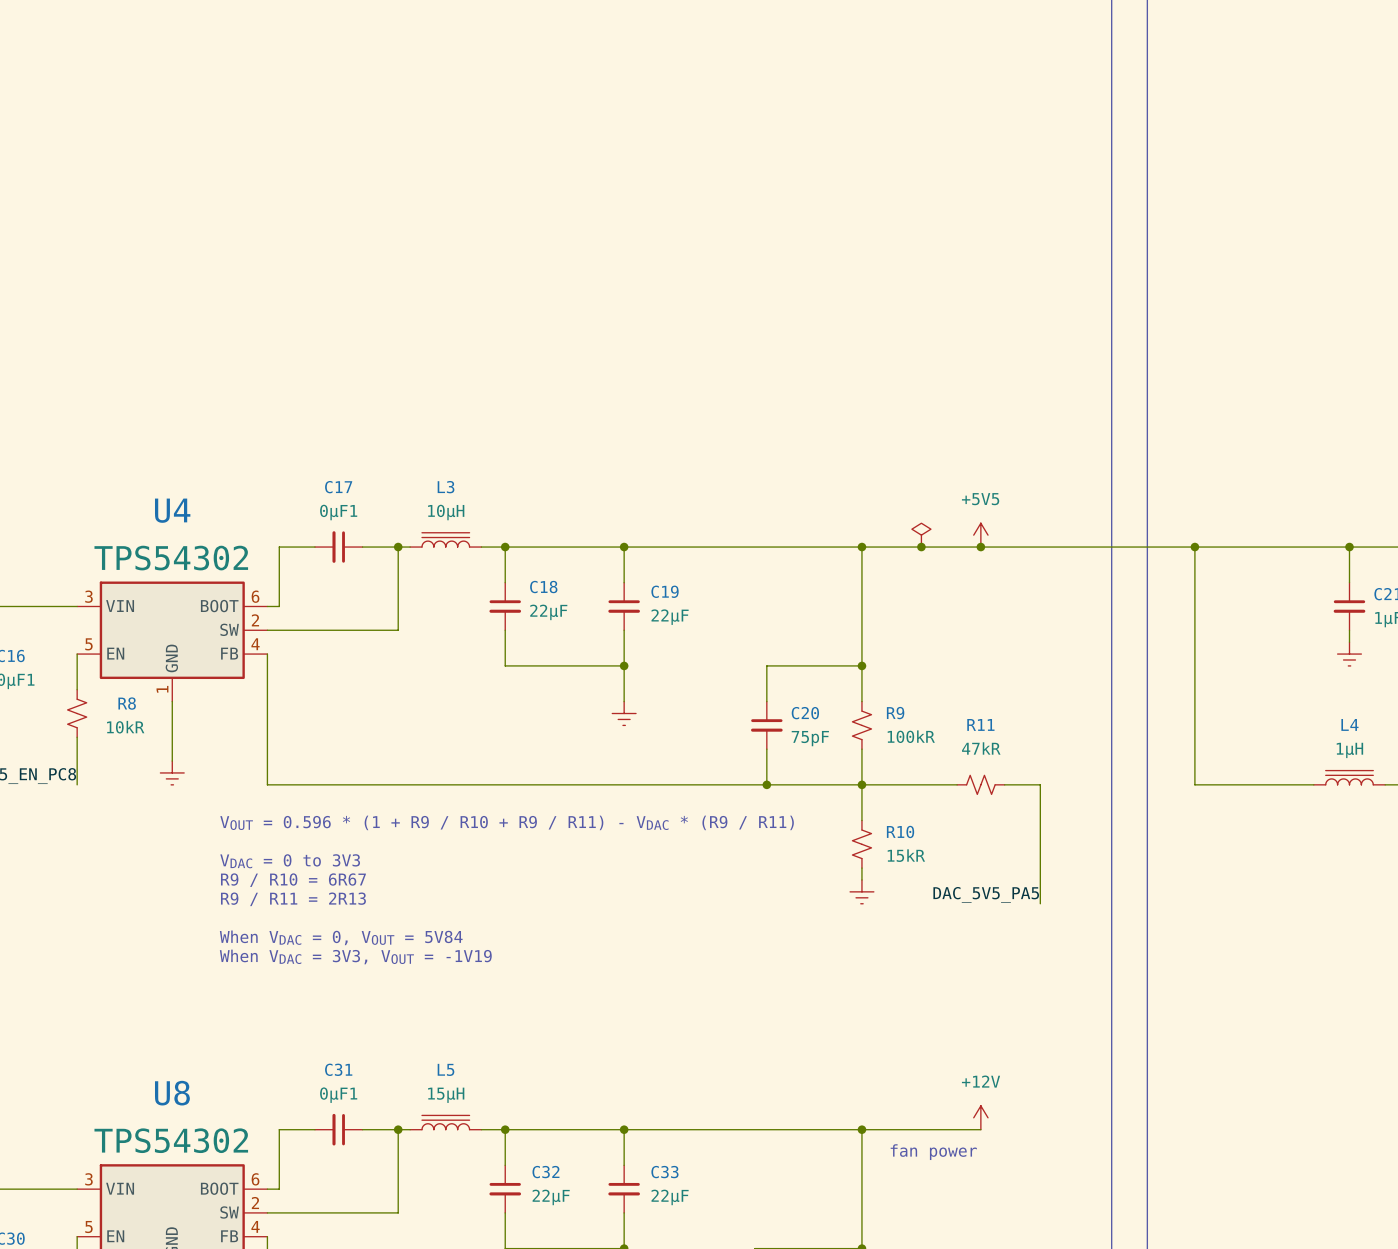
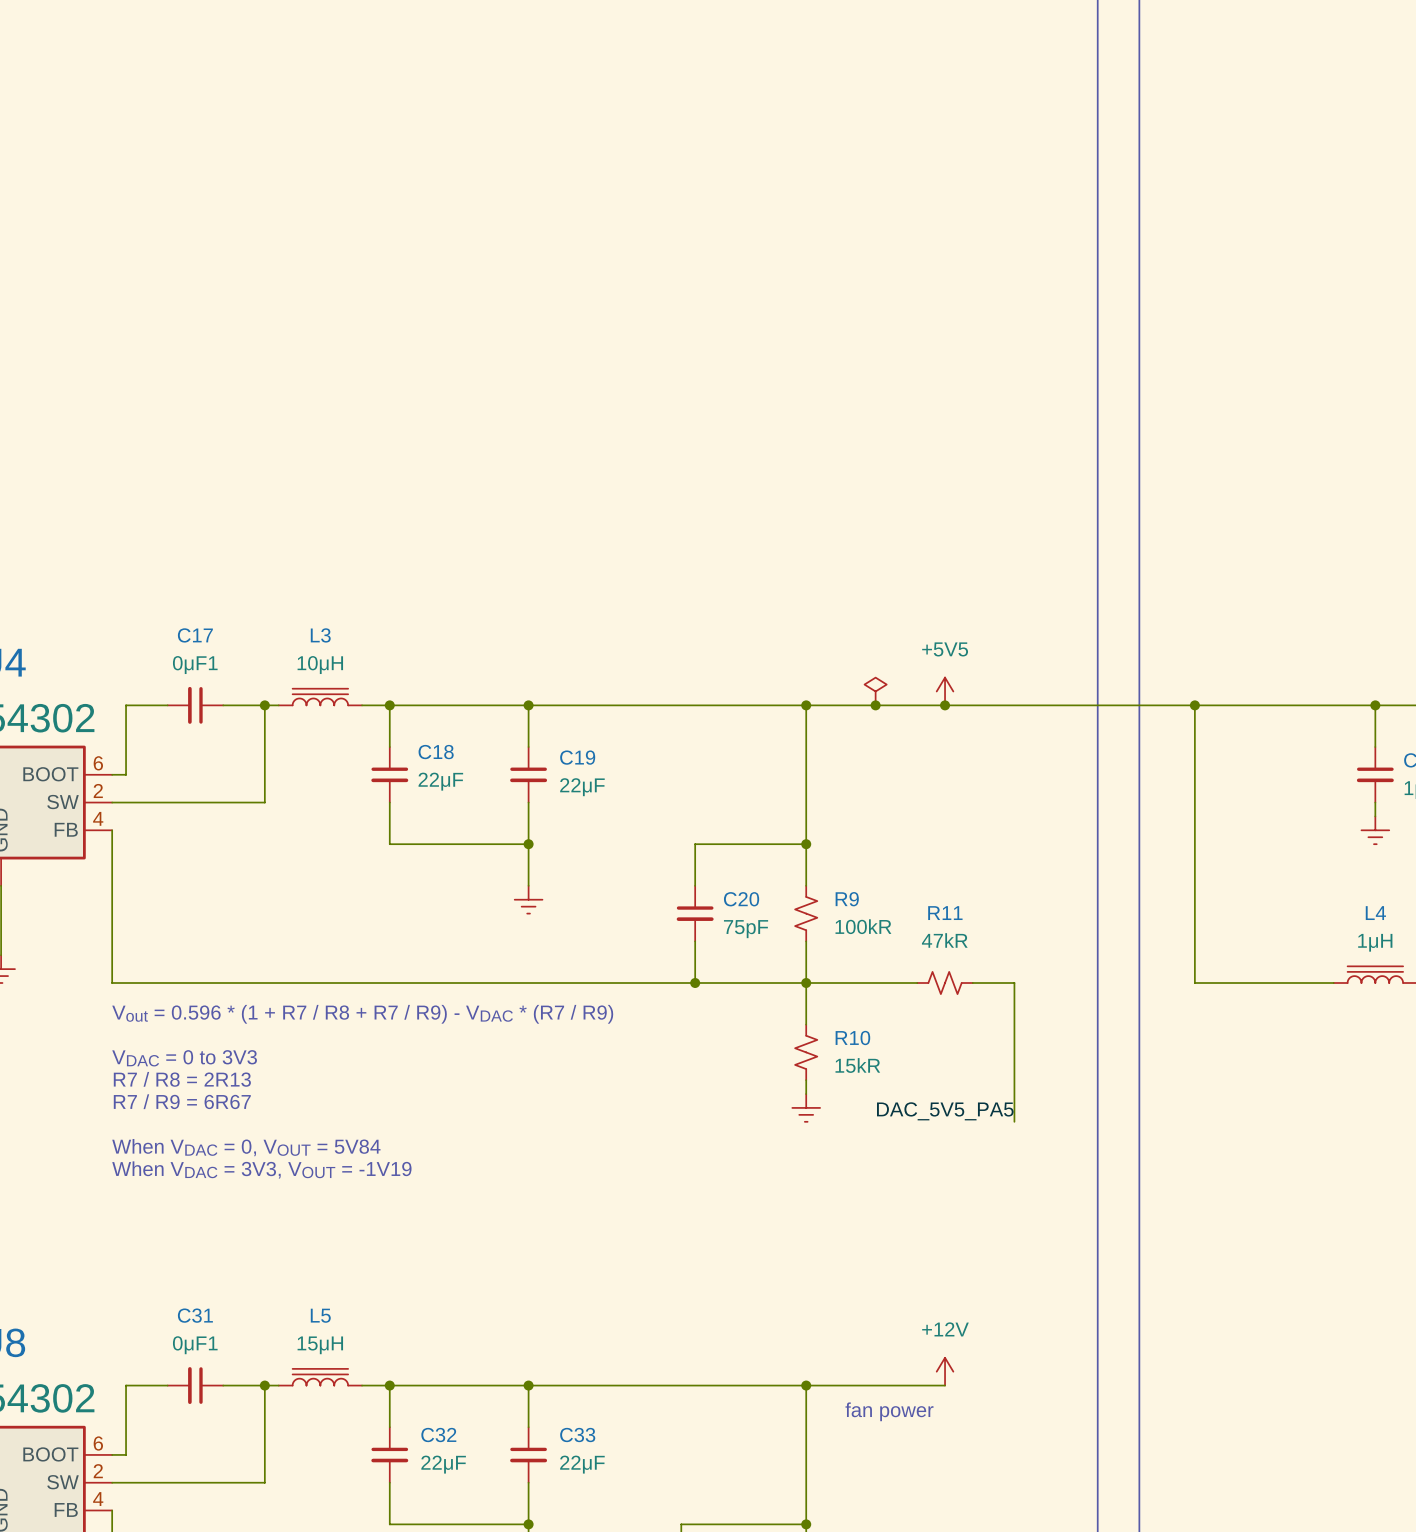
text: VOUT = 0.596 * (1 + R9 / R10 + R9 / R11) - VDAC * (R9 / R11) (507, 822) -> Vout = 0.596 * (1 + R7 / R8 + R7 / R9) - VDAC * (R7 / R9) (362, 1014)
text position: VDAC = 0 to 3V3 (290, 861) -> VDAC = 0 to 3V3 (184, 1058)
text: none -> R7 / R8 = 2R13 (182, 1079)
text: R9 / R10 = 6R67 (293, 880) -> none
text: none -> R7 / R9 = 6R67 (182, 1101)
text: R9 / R11 = 2R13 (293, 899) -> none
text position: When VDAC = 0, VOUT = 5V84 (341, 937) -> When VDAC = 0, VOUT = 5V84 (246, 1147)
text position: When VDAC = 3V3, VOUT = -1V19 (355, 956) -> When VDAC = 3V3, VOUT = -1V19 (261, 1169)

